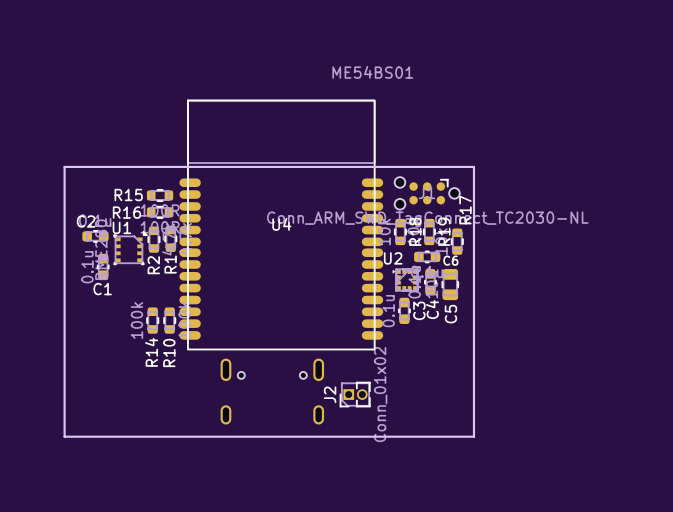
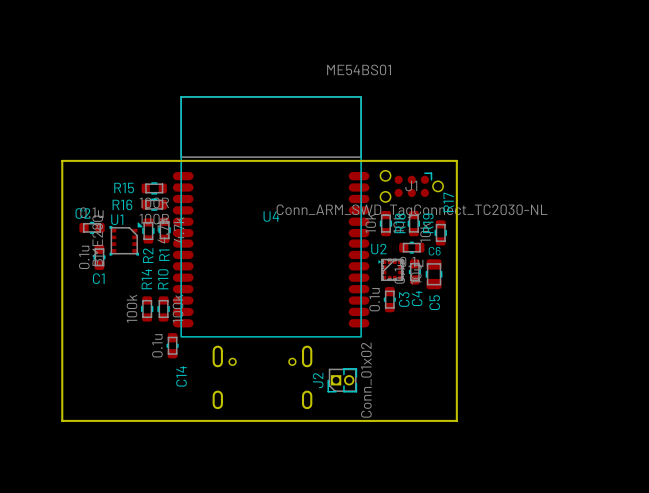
R14 name position: R14 (151, 352) -> R14 (146, 279)
R10 name position: R10 (169, 352) -> R10 (163, 279)
C14: none -> 0.1u (172, 345)

